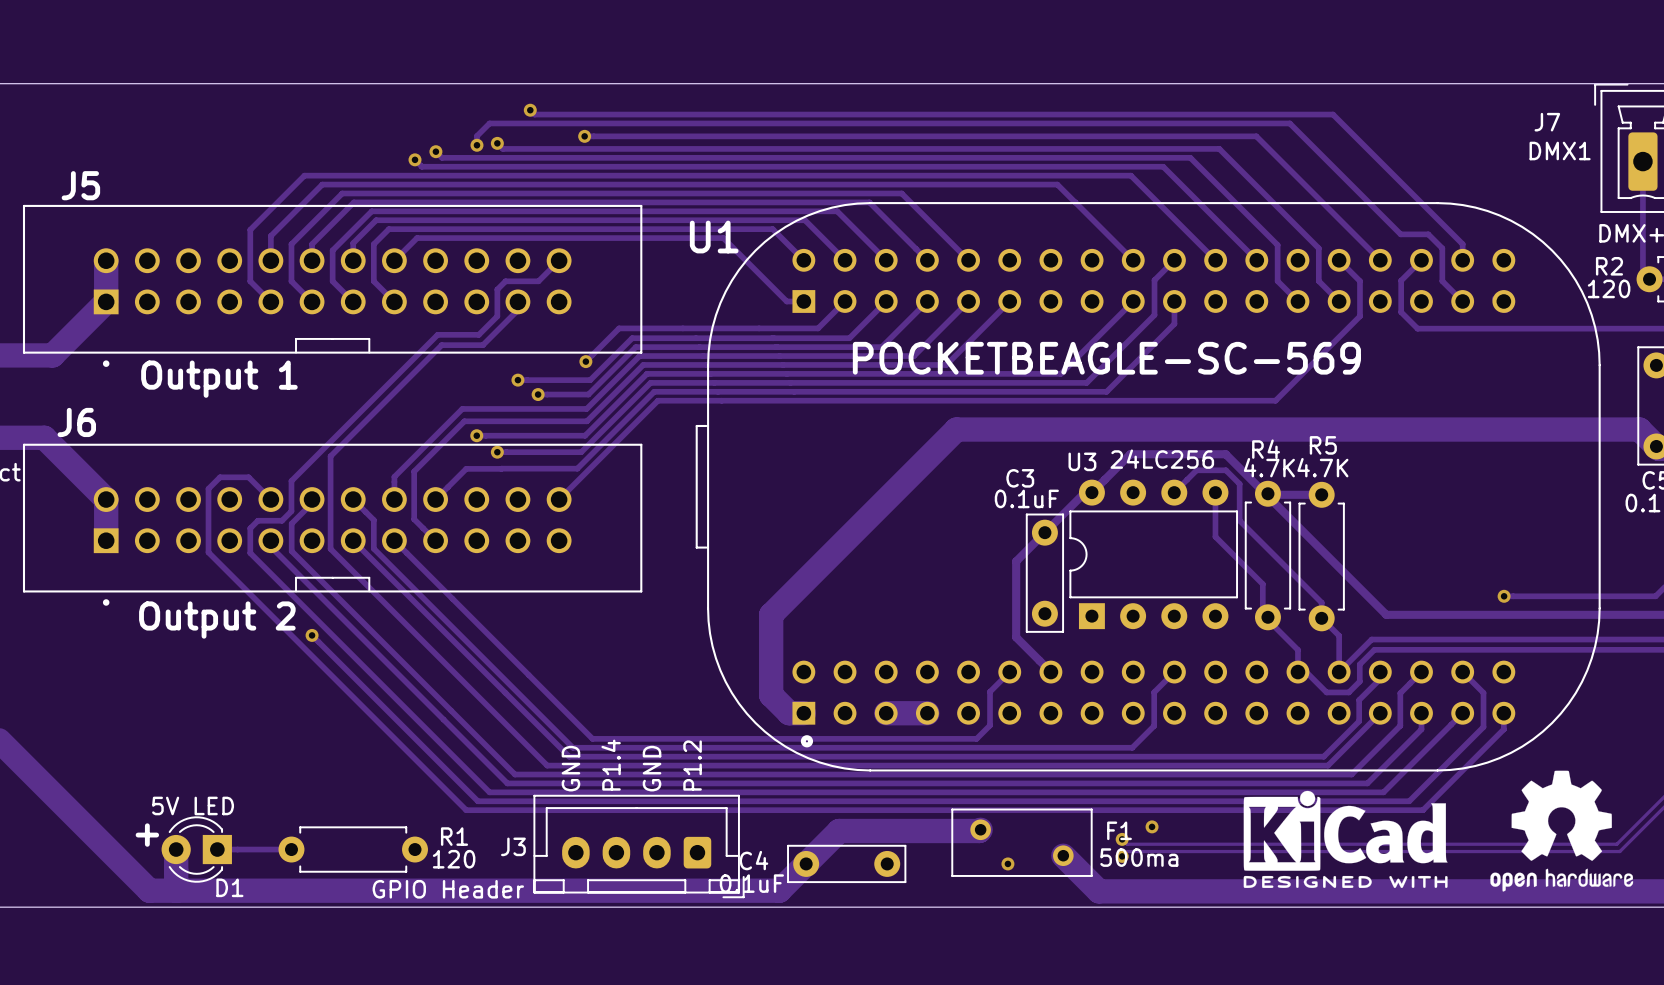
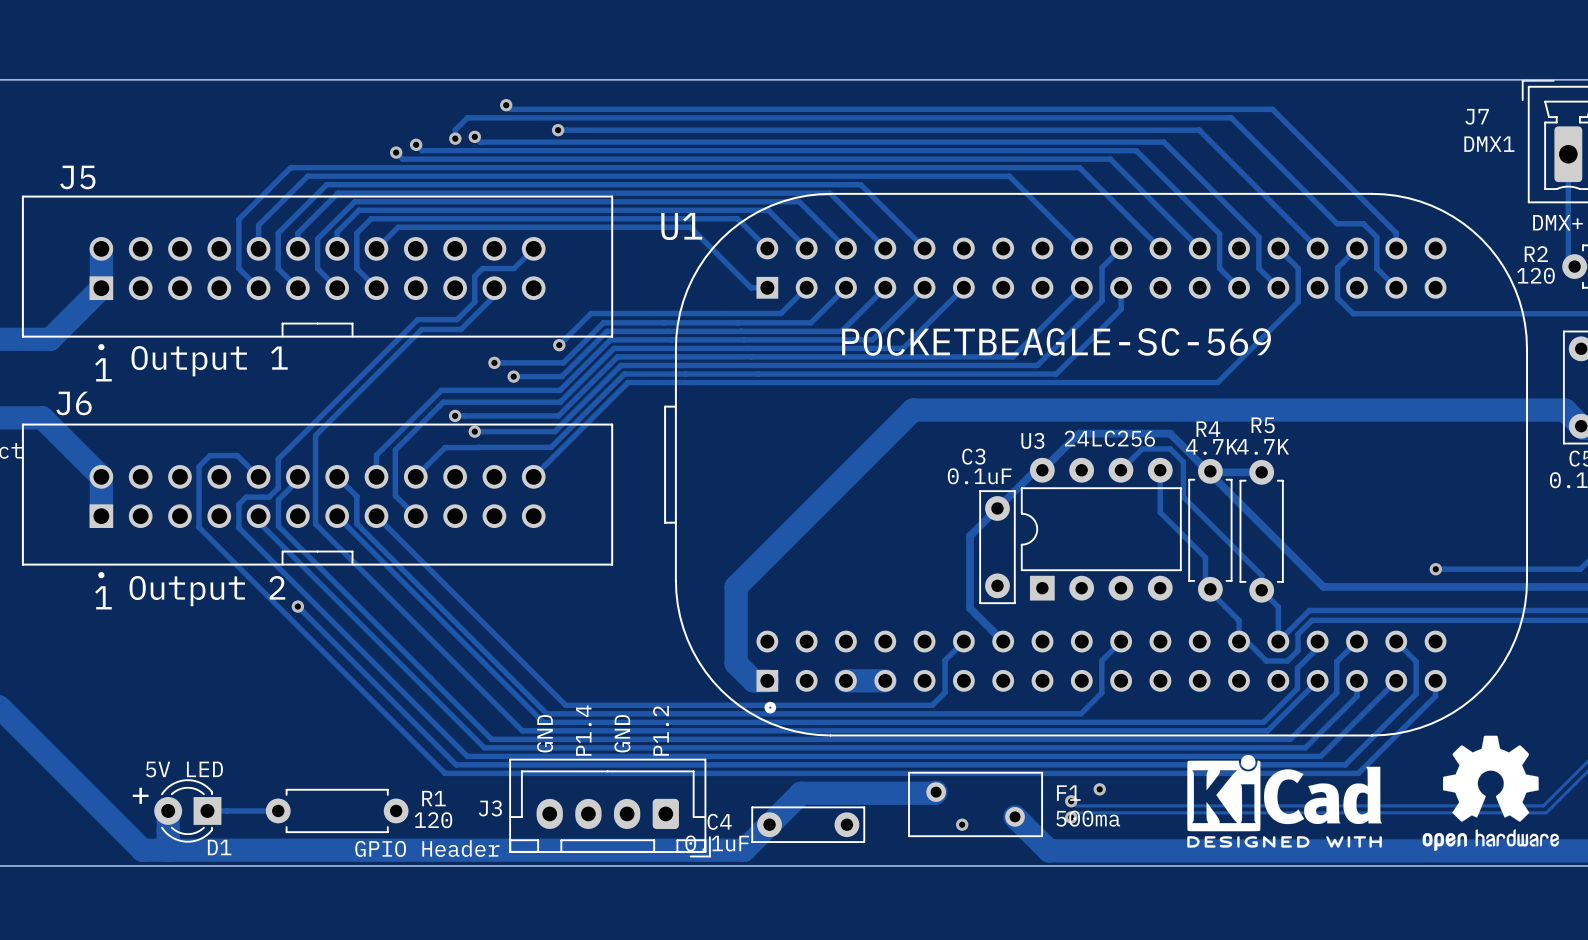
text: none -> 1 (103, 369)
text: none -> 1 (103, 597)

